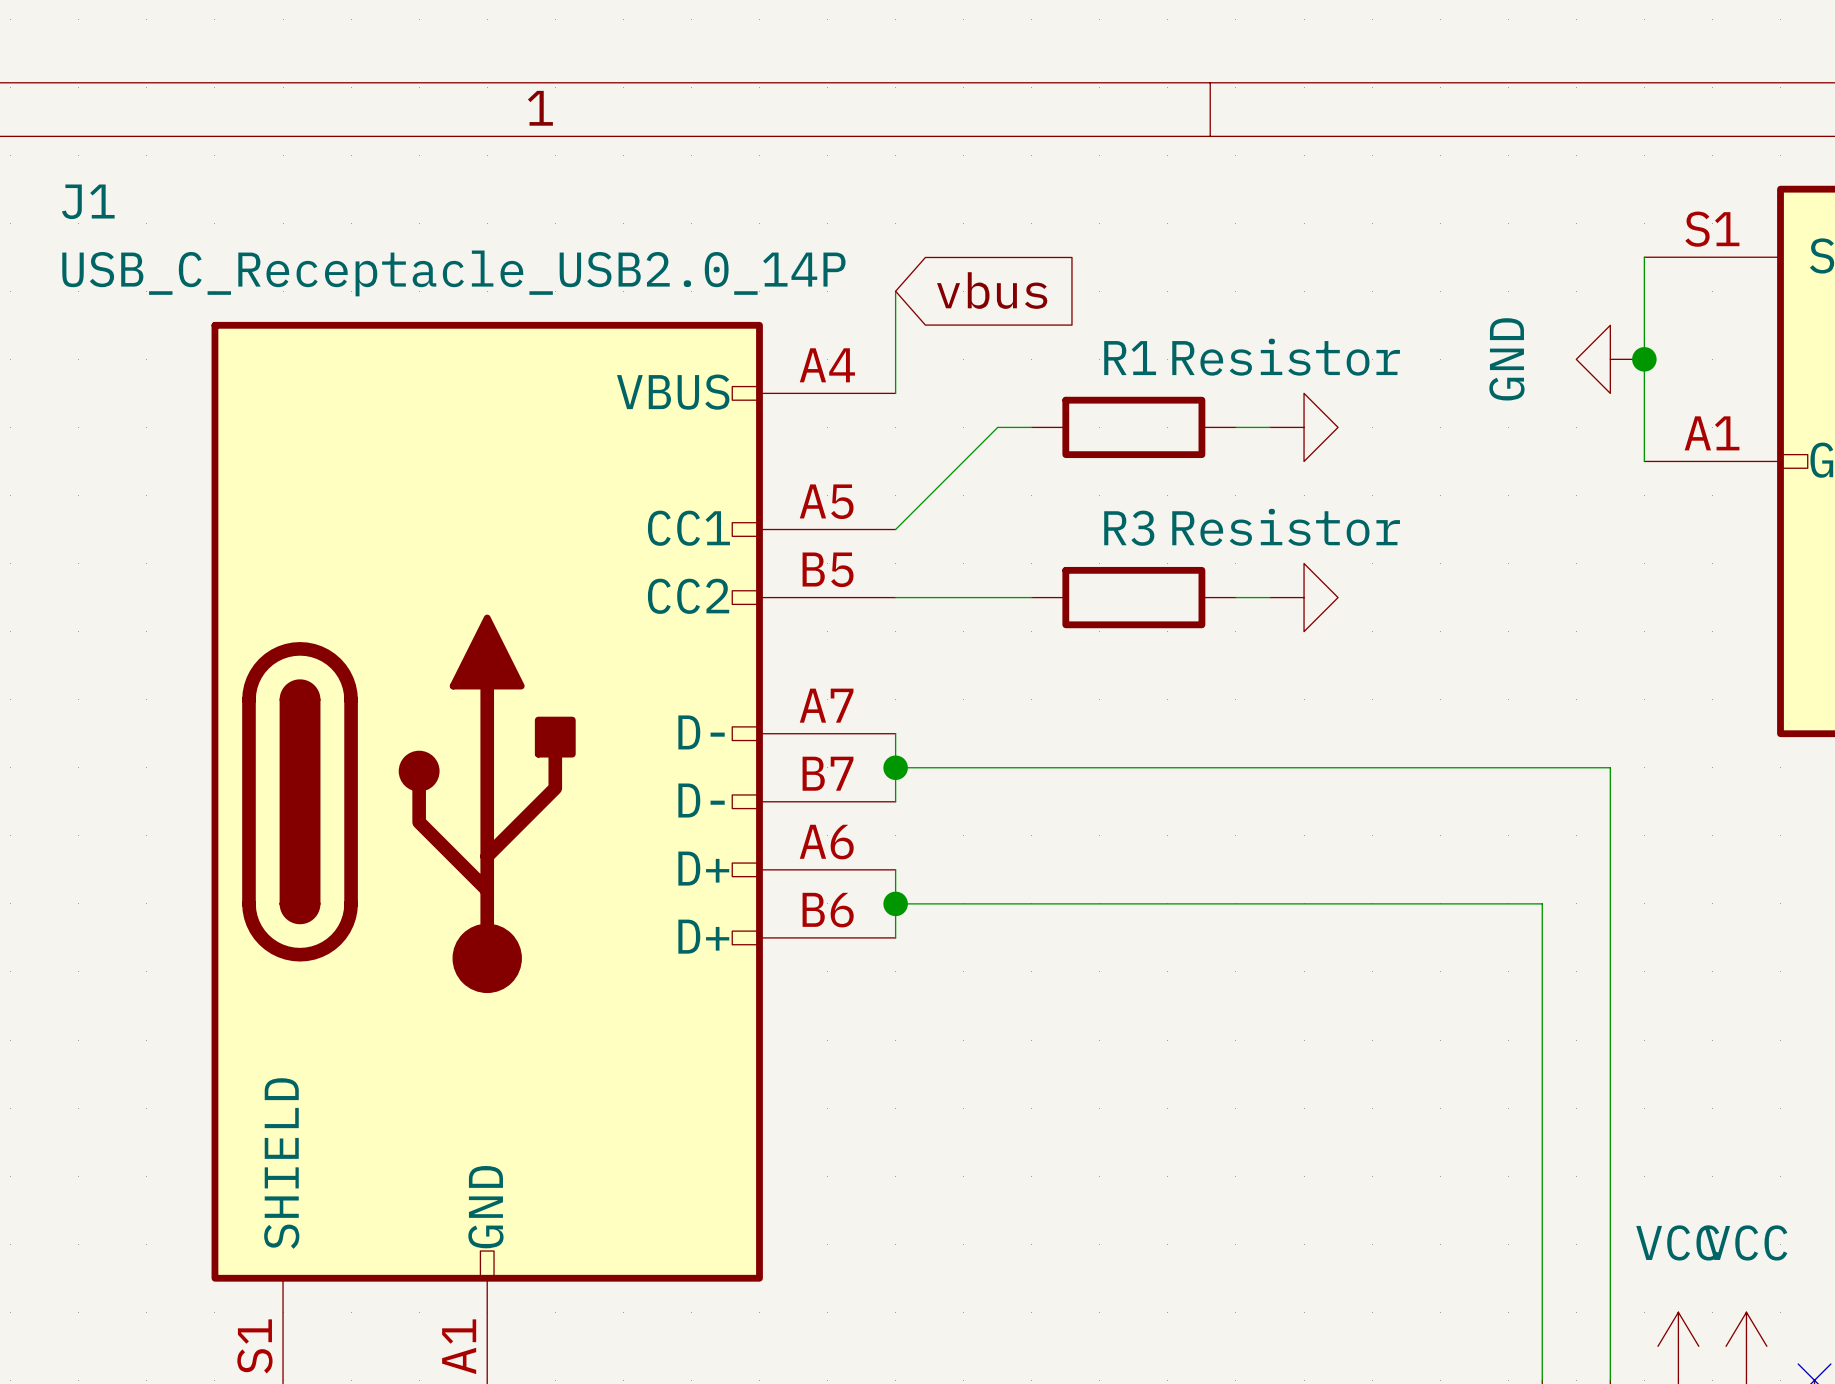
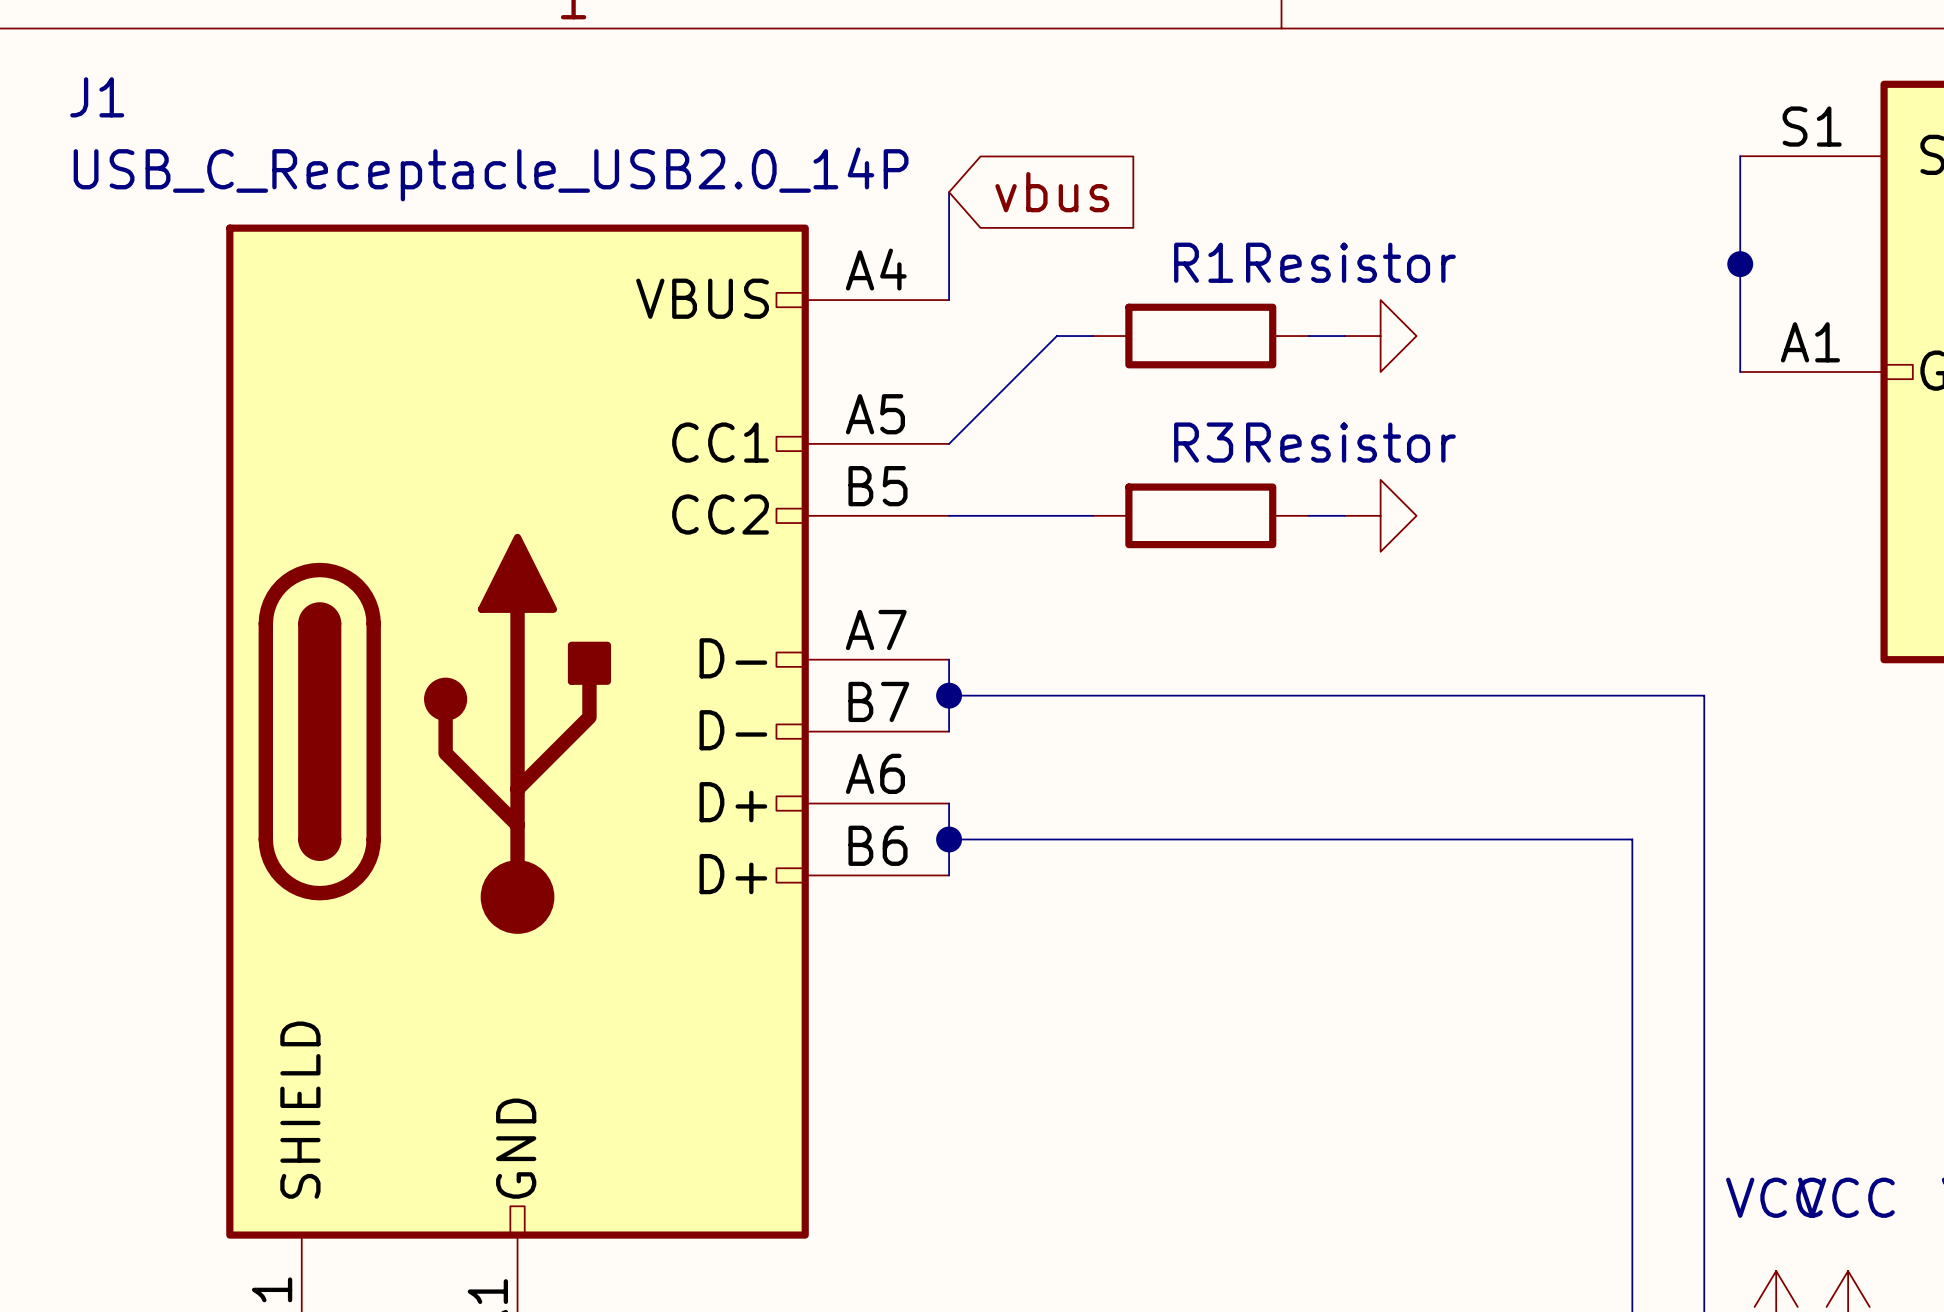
power symbol: GND (1610, 359) -> none

